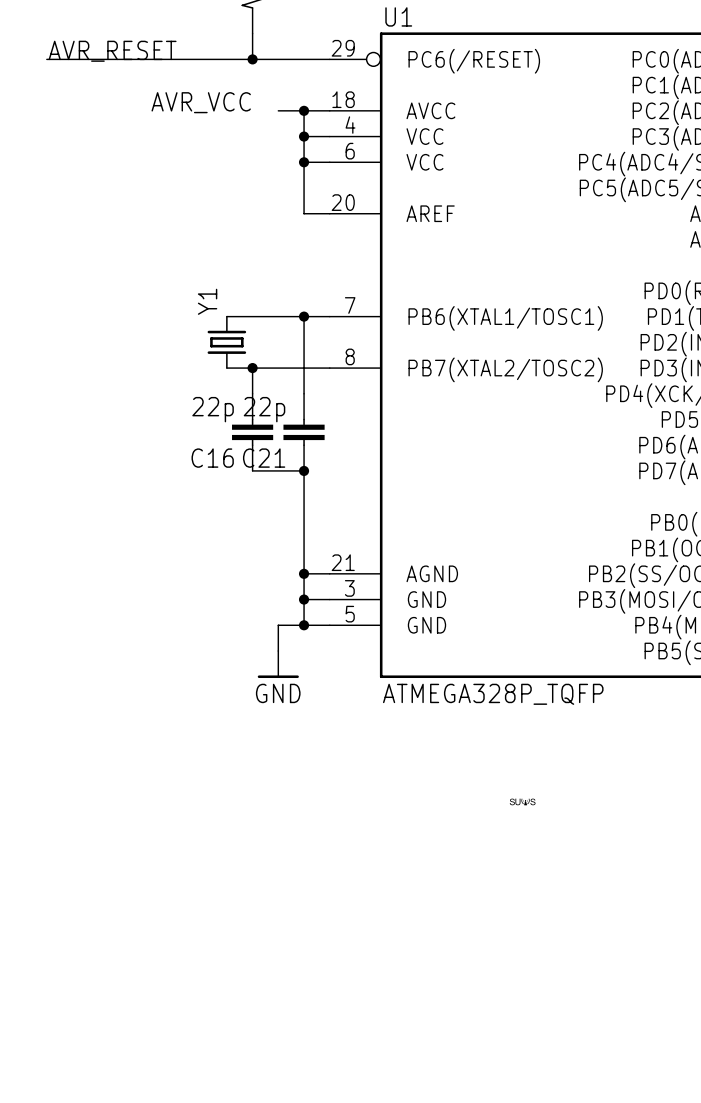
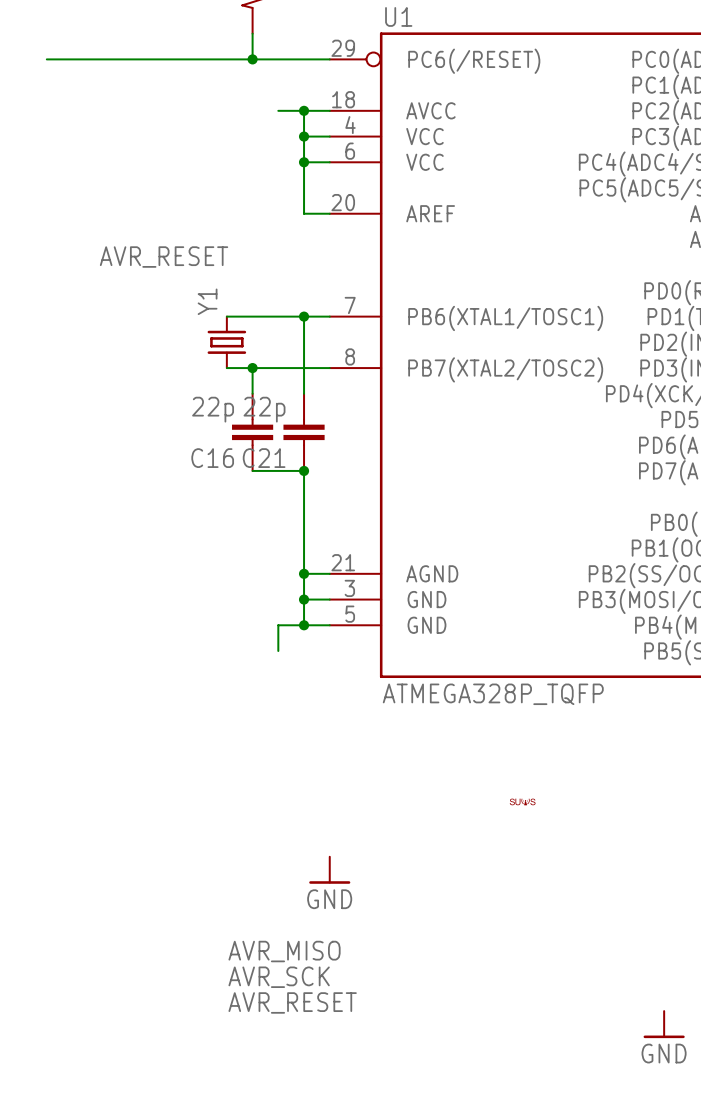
label: AVR_RESET (112, 51) -> none
label: AVR_VCC (201, 102) -> none
label: none -> AVR_RESET (164, 257)
power symbol position: GND (278, 664) -> GND (329, 870)
label: none -> AVR_MISO (284, 951)
label: none -> AVR_SCK (279, 977)
label: none -> AVR_RESET (292, 1002)
power symbol: none -> GND (664, 1024)

